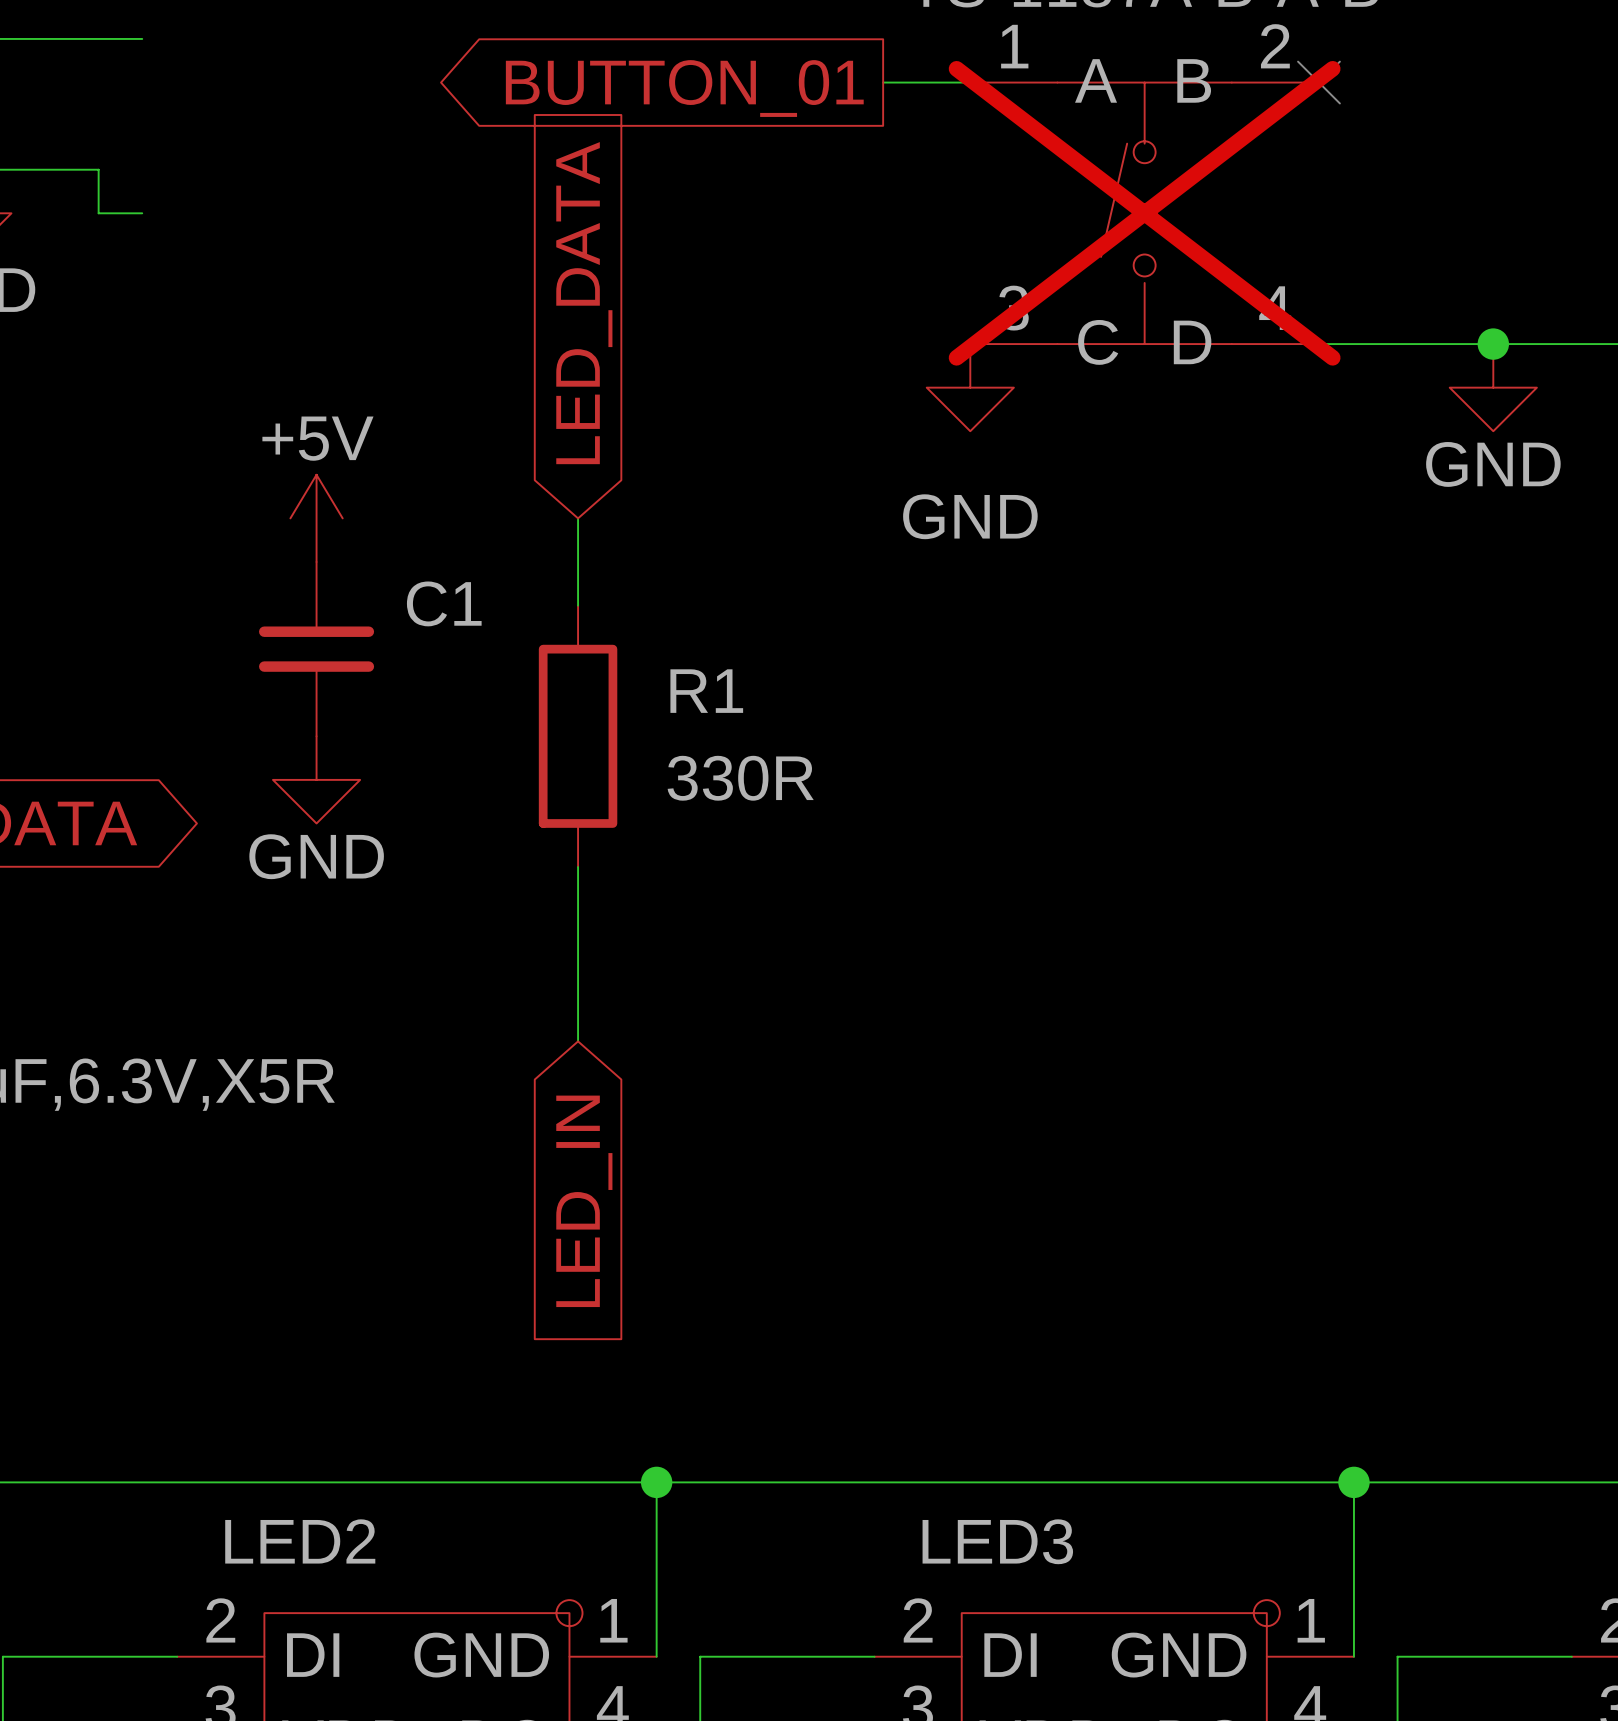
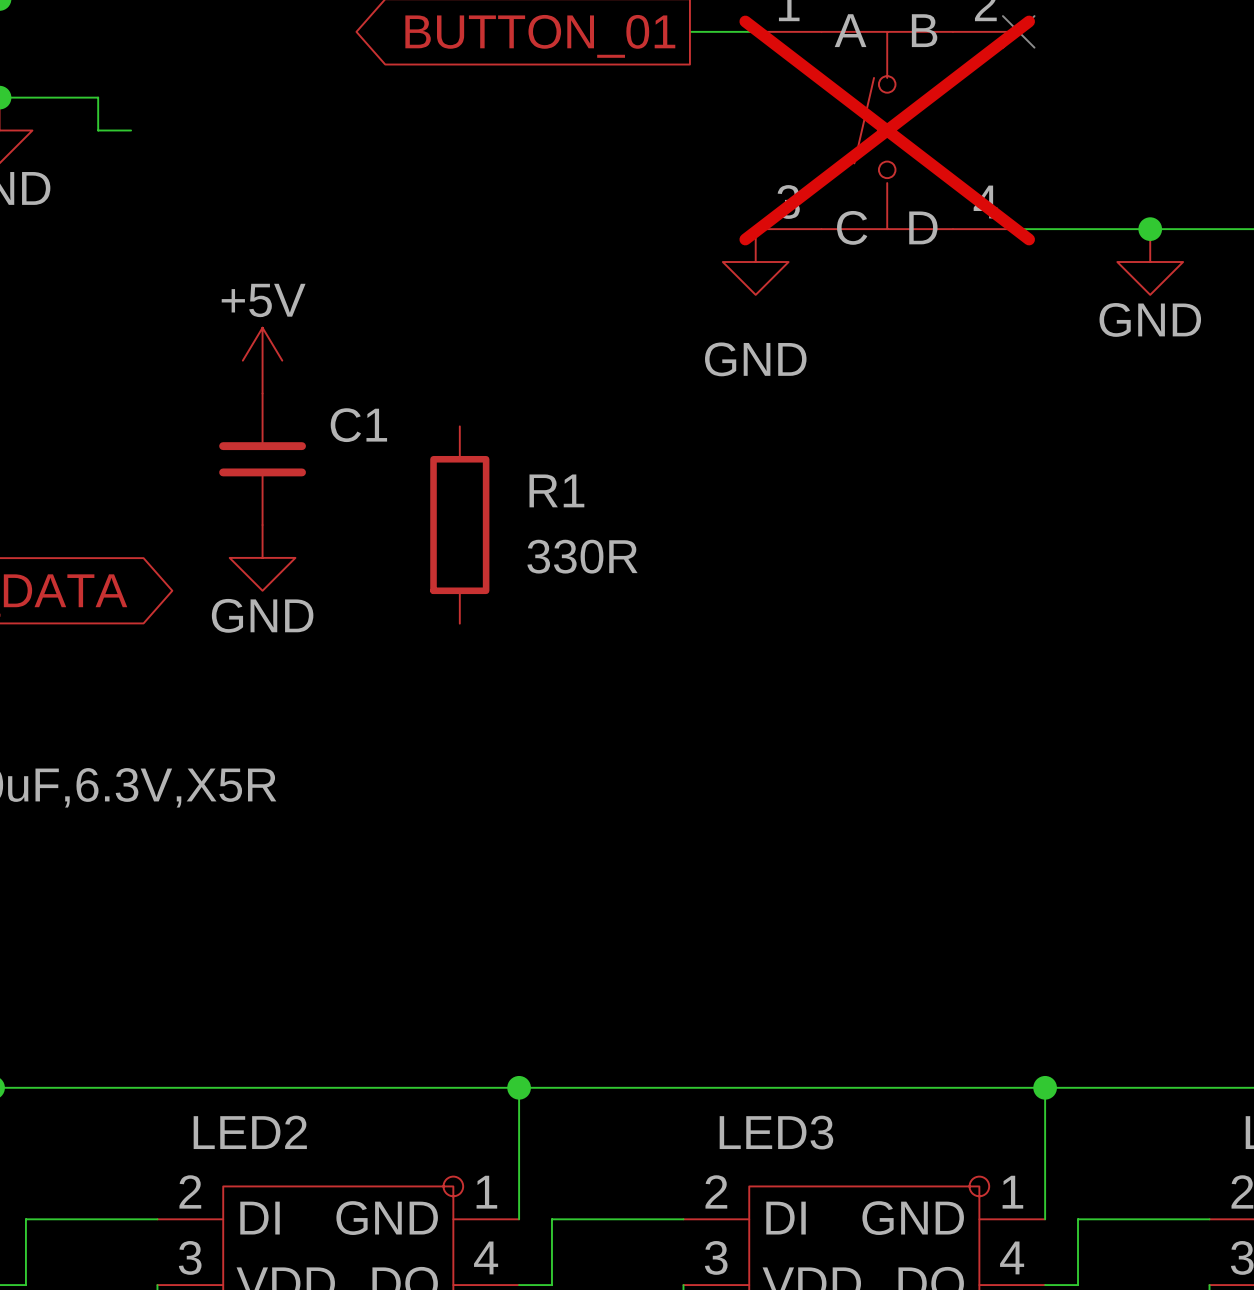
global label: LED_DATA (584, 303) -> none
wire: (578, 518) (578, 605) -> none
wire: (578, 867) (578, 1041) -> none
global label: LED_IN (584, 1201) -> none

